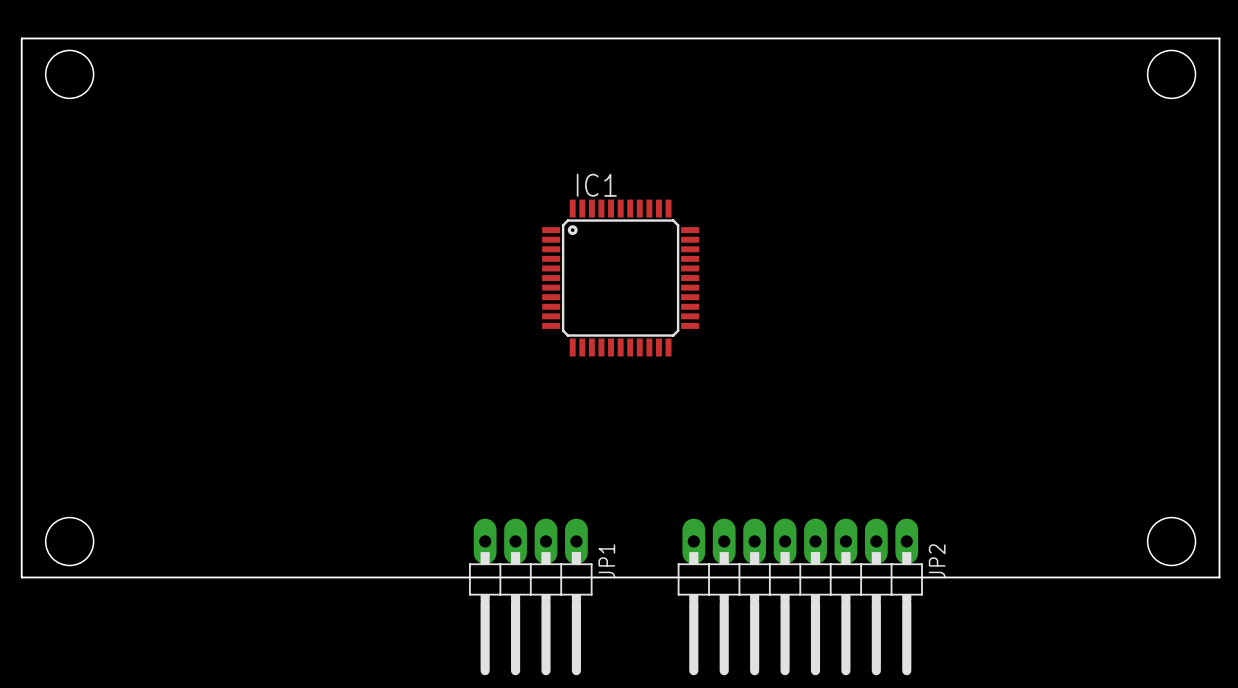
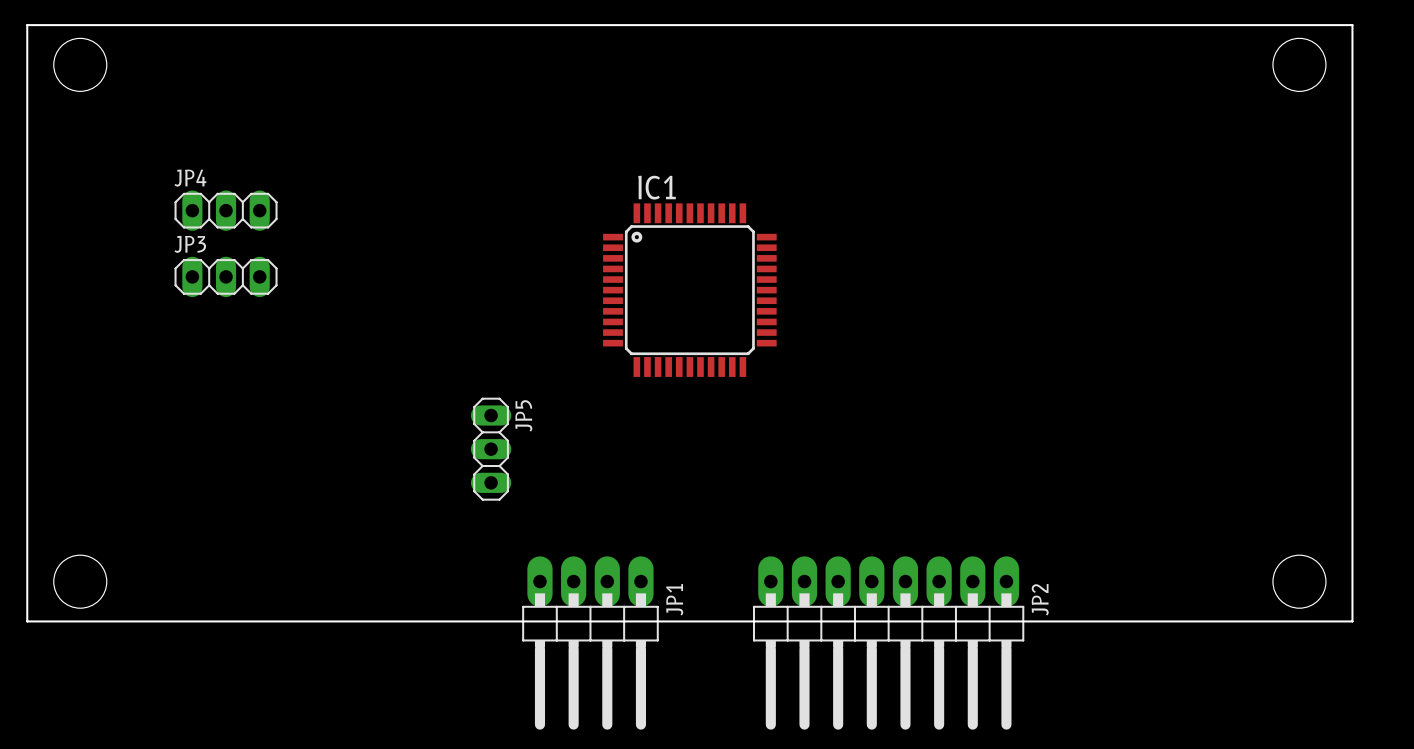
JP4: none -> (226, 210)
JP3: none -> (226, 276)
JP5: none -> (491, 449)

